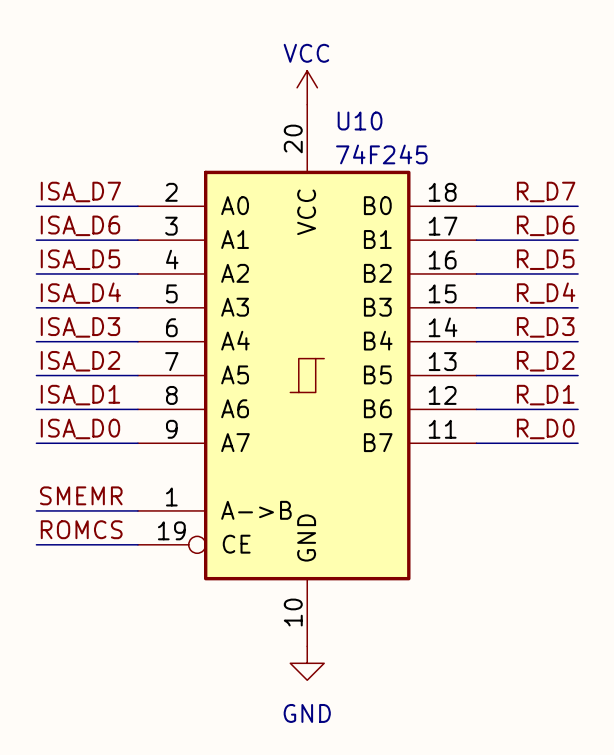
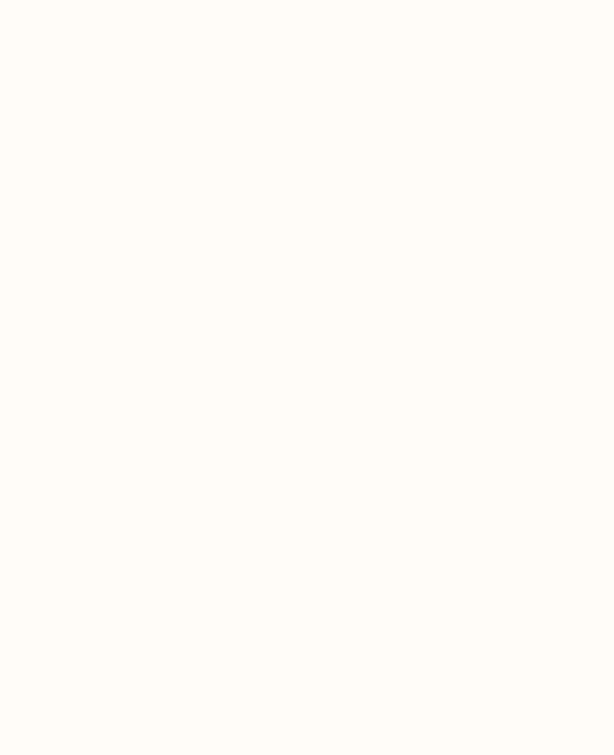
power symbol: VCC (307, 87) -> none
label: ISA_D7 (80, 191) -> none
label: R_D7 (546, 191) -> none
wire: (36, 206) (137, 206) -> none
wire: (476, 206) (578, 206) -> none
label: ISA_D6 (80, 225) -> none
label: R_D6 (545, 225) -> none
wire: (36, 240) (137, 240) -> none
wire: (476, 240) (578, 240) -> none
label: ISA_D5 (80, 259) -> none
label: R_D5 (545, 259) -> none
wire: (36, 273) (137, 273) -> none
wire: (476, 273) (578, 273) -> none
label: ISA_D4 (80, 293) -> none
label: R_D4 (546, 293) -> none
wire: (36, 307) (137, 307) -> none
wire: (476, 307) (578, 307) -> none
label: ISA_D3 (80, 327) -> none
label: R_D3 (545, 327) -> none
wire: (36, 341) (137, 341) -> none
wire: (476, 341) (578, 341) -> none
label: ISA_D2 (80, 361) -> none
label: R_D2 (545, 361) -> none
wire: (36, 375) (137, 375) -> none
U10: 74F245 (307, 375) -> none
wire: (476, 375) (578, 375) -> none
label: ISA_D1 (80, 395) -> none
label: R_D1 (545, 395) -> none
wire: (36, 409) (137, 409) -> none
wire: (476, 409) (578, 409) -> none
label: ISA_D0 (80, 428) -> none
label: R_D0 (545, 428) -> none
wire: (36, 443) (137, 443) -> none
wire: (476, 443) (578, 443) -> none
label: SMEMR (81, 495) -> none
wire: (36, 510) (137, 510) -> none
label: ROMCS (81, 529) -> none
wire: (36, 544) (137, 544) -> none
power symbol: GND (307, 663) -> none

